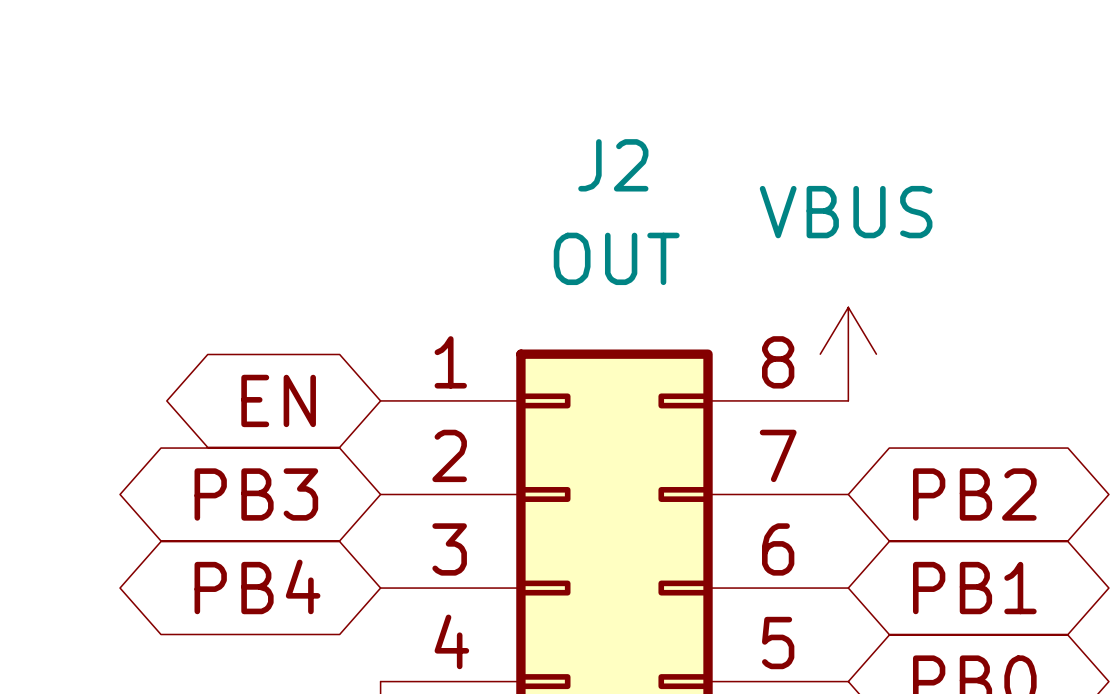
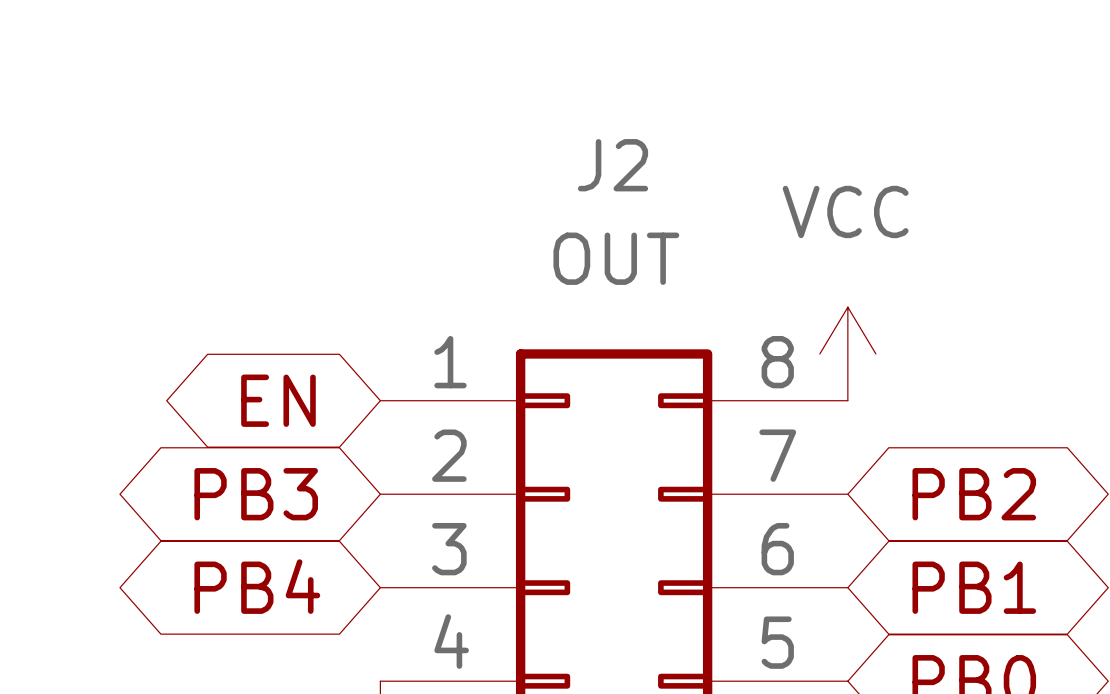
power symbol: VBUS (848, 354) -> VCC (847, 353)

